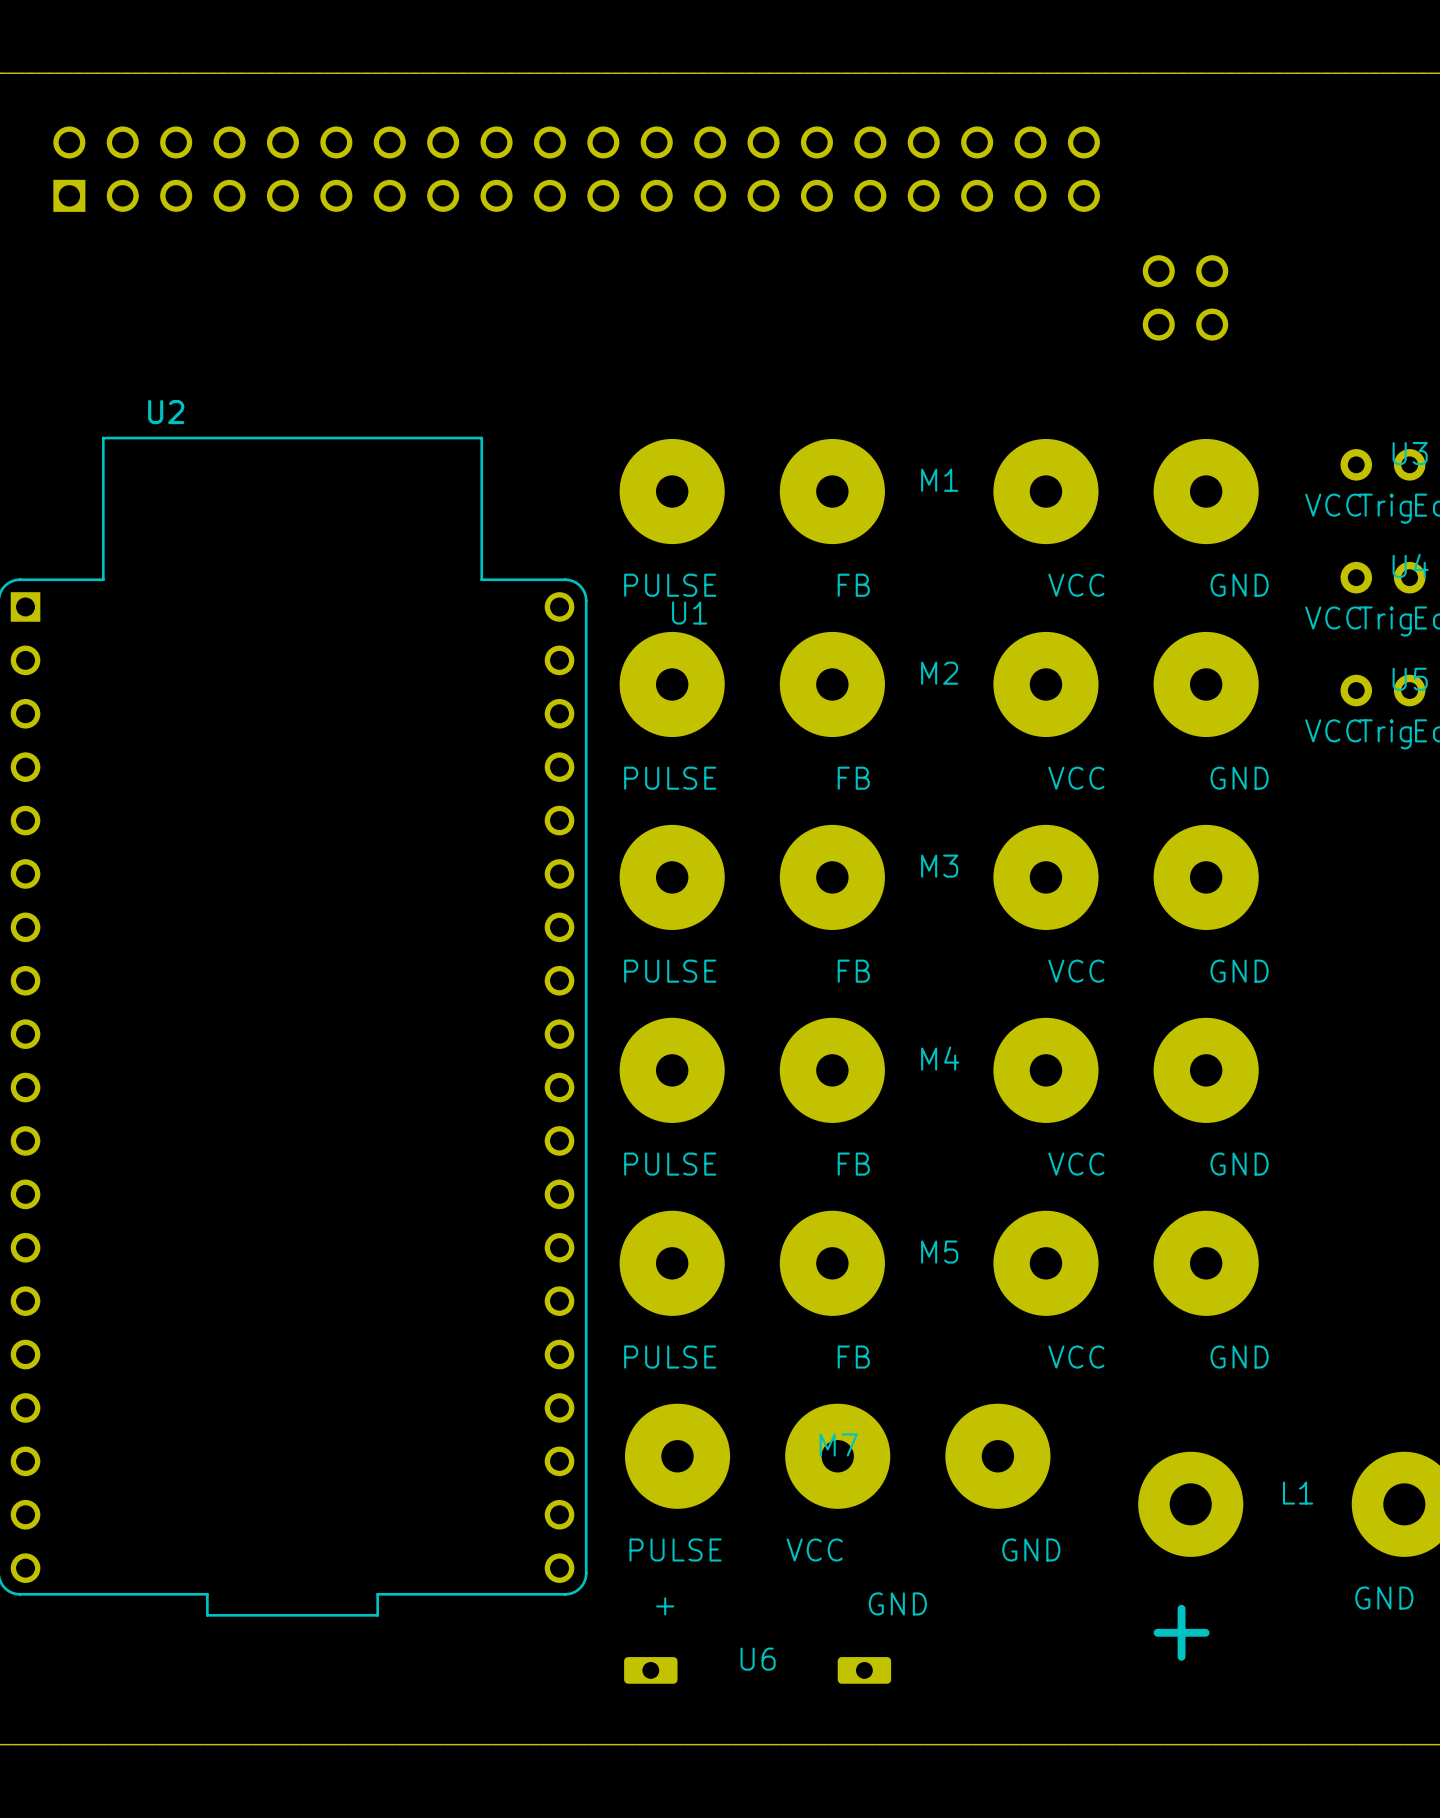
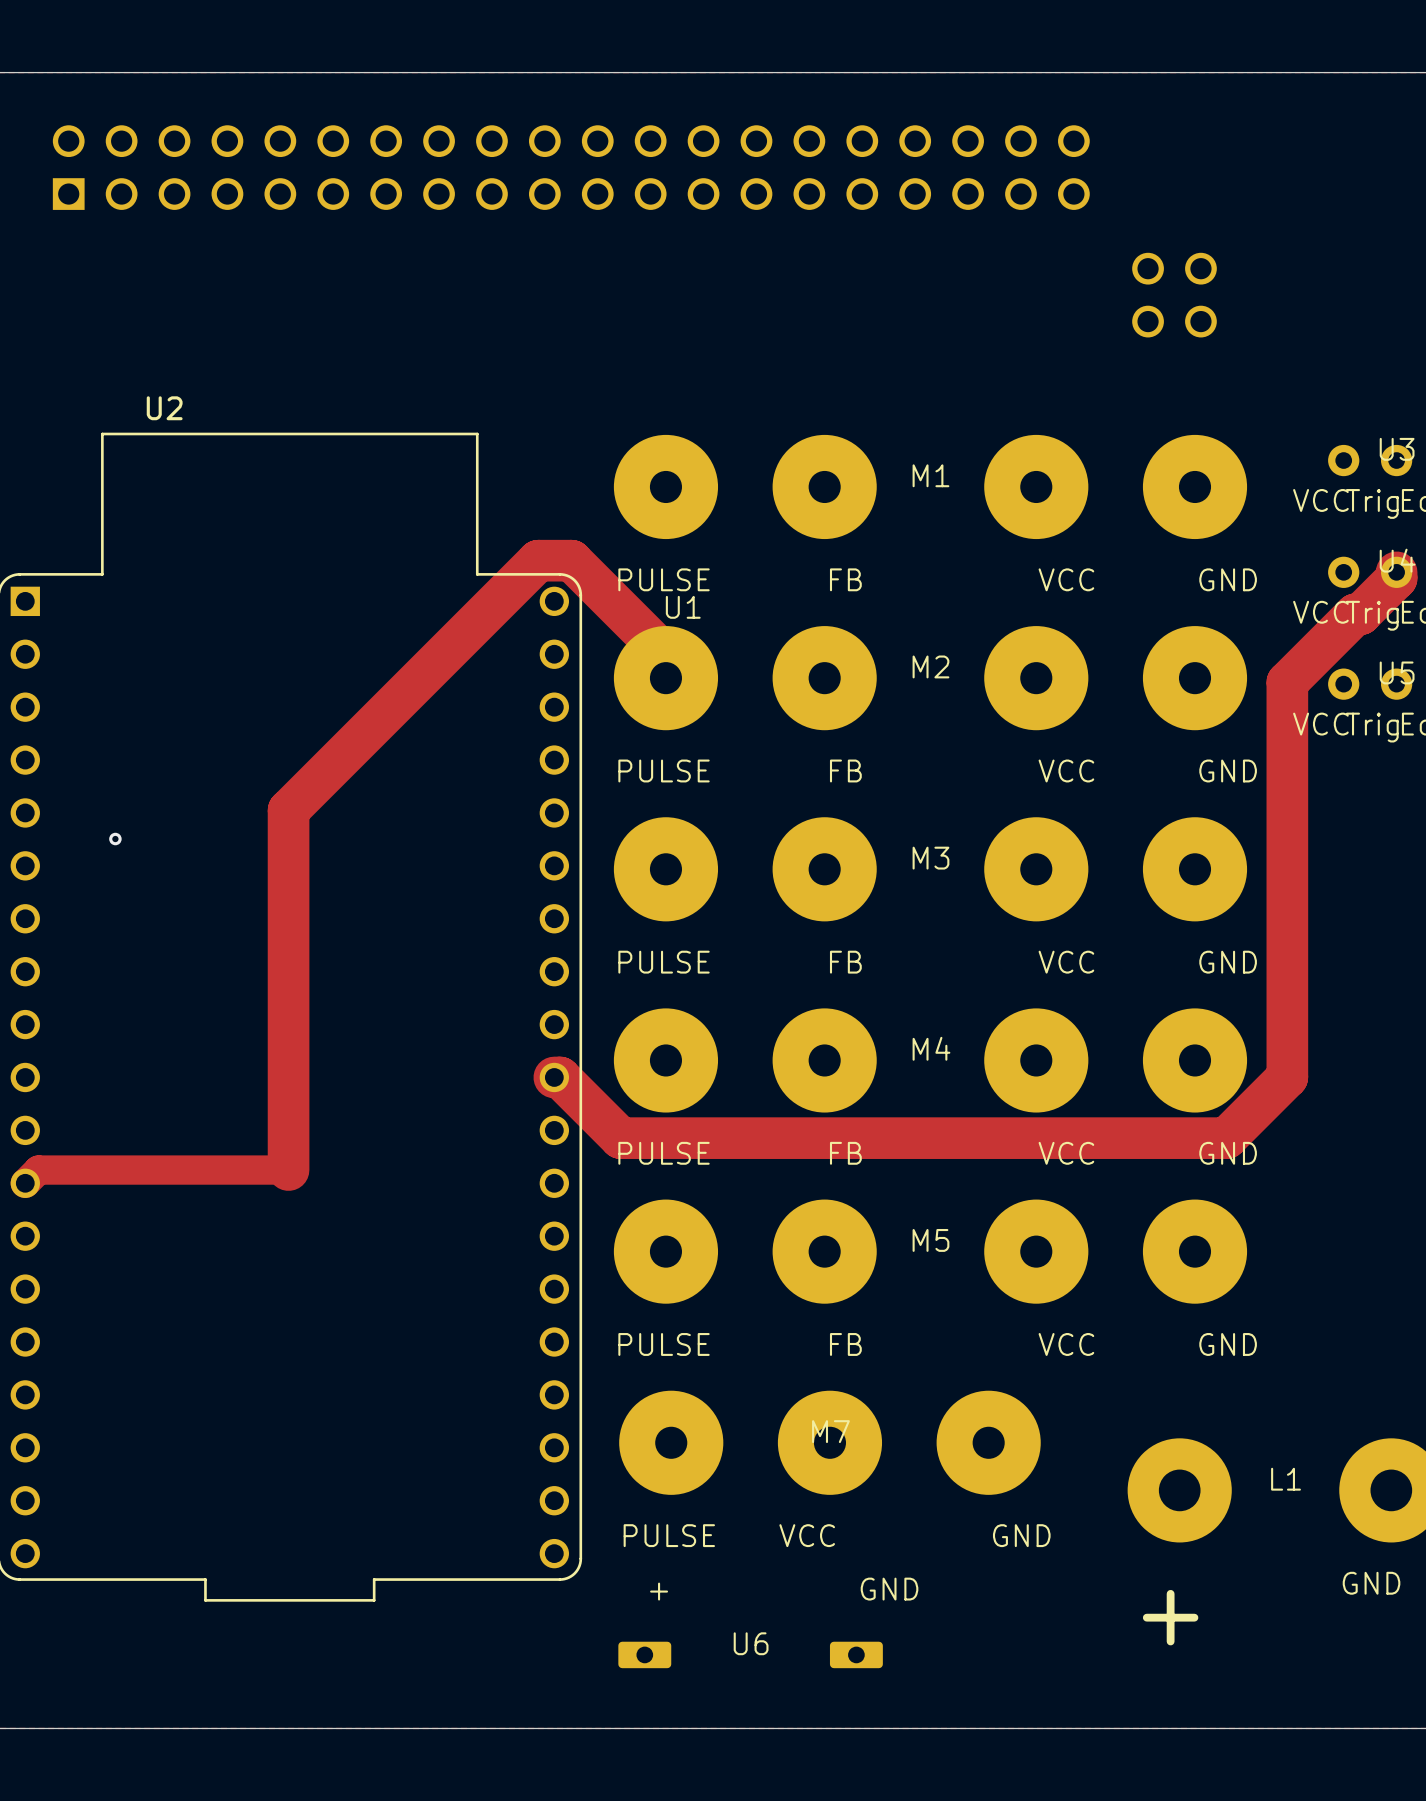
track: none -> (1396, 572) (1396, 578) (1360, 614) (1355, 614) (1287, 682) (1287, 1077) (1226, 1138) (620, 1138) (560, 1077) (554, 1077)
track: none -> (665, 678) (665, 655) (571, 560) (538, 560) (288, 810) (288, 1170) (38, 1170) (25, 1183)
via: none -> (115, 839)

